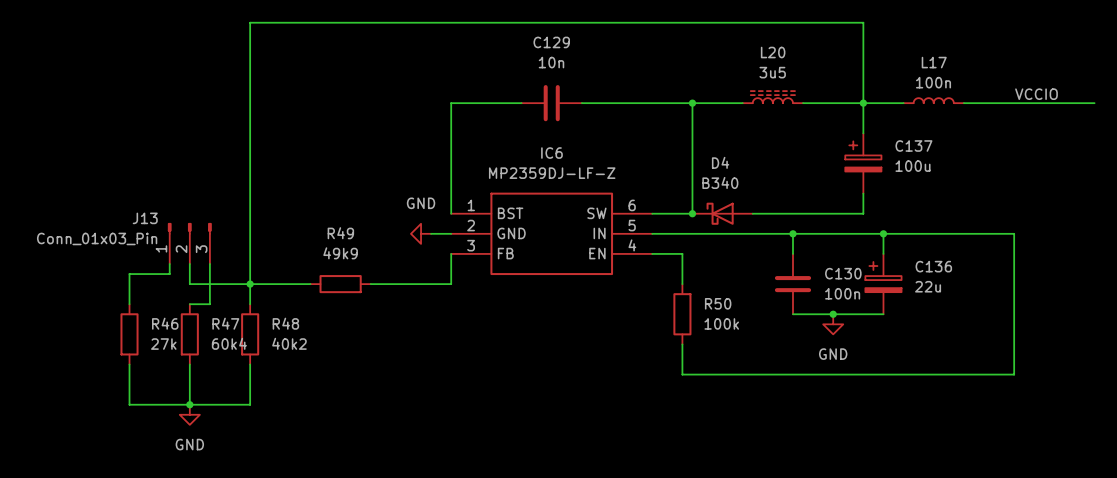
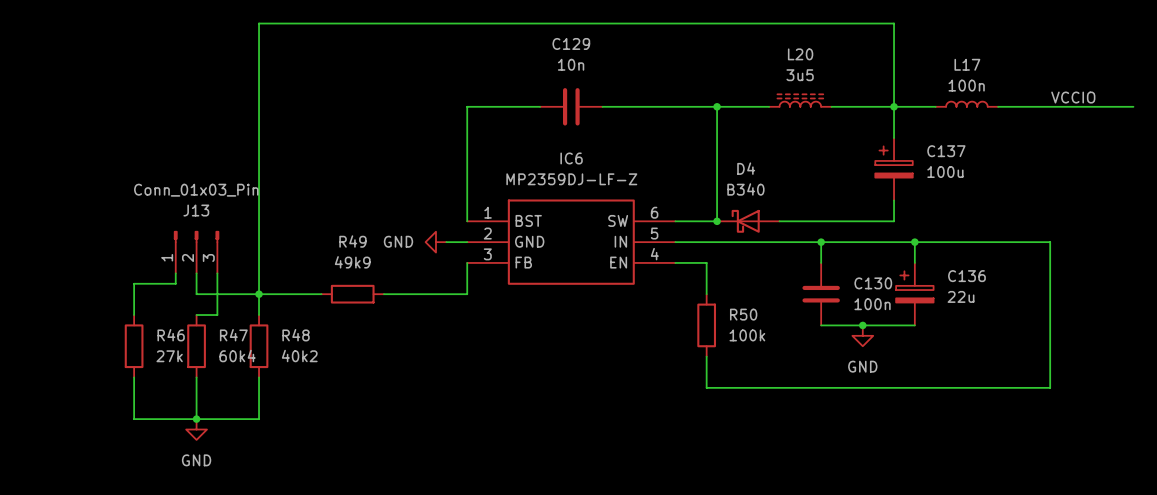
power symbol text position: GND (421, 203) -> GND (398, 241)
J13 name position: J13 (145, 218) -> J13 (196, 210)
J13 value position: Conn_01x03_Pin (97, 238) -> Conn_01x03_Pin (196, 190)

